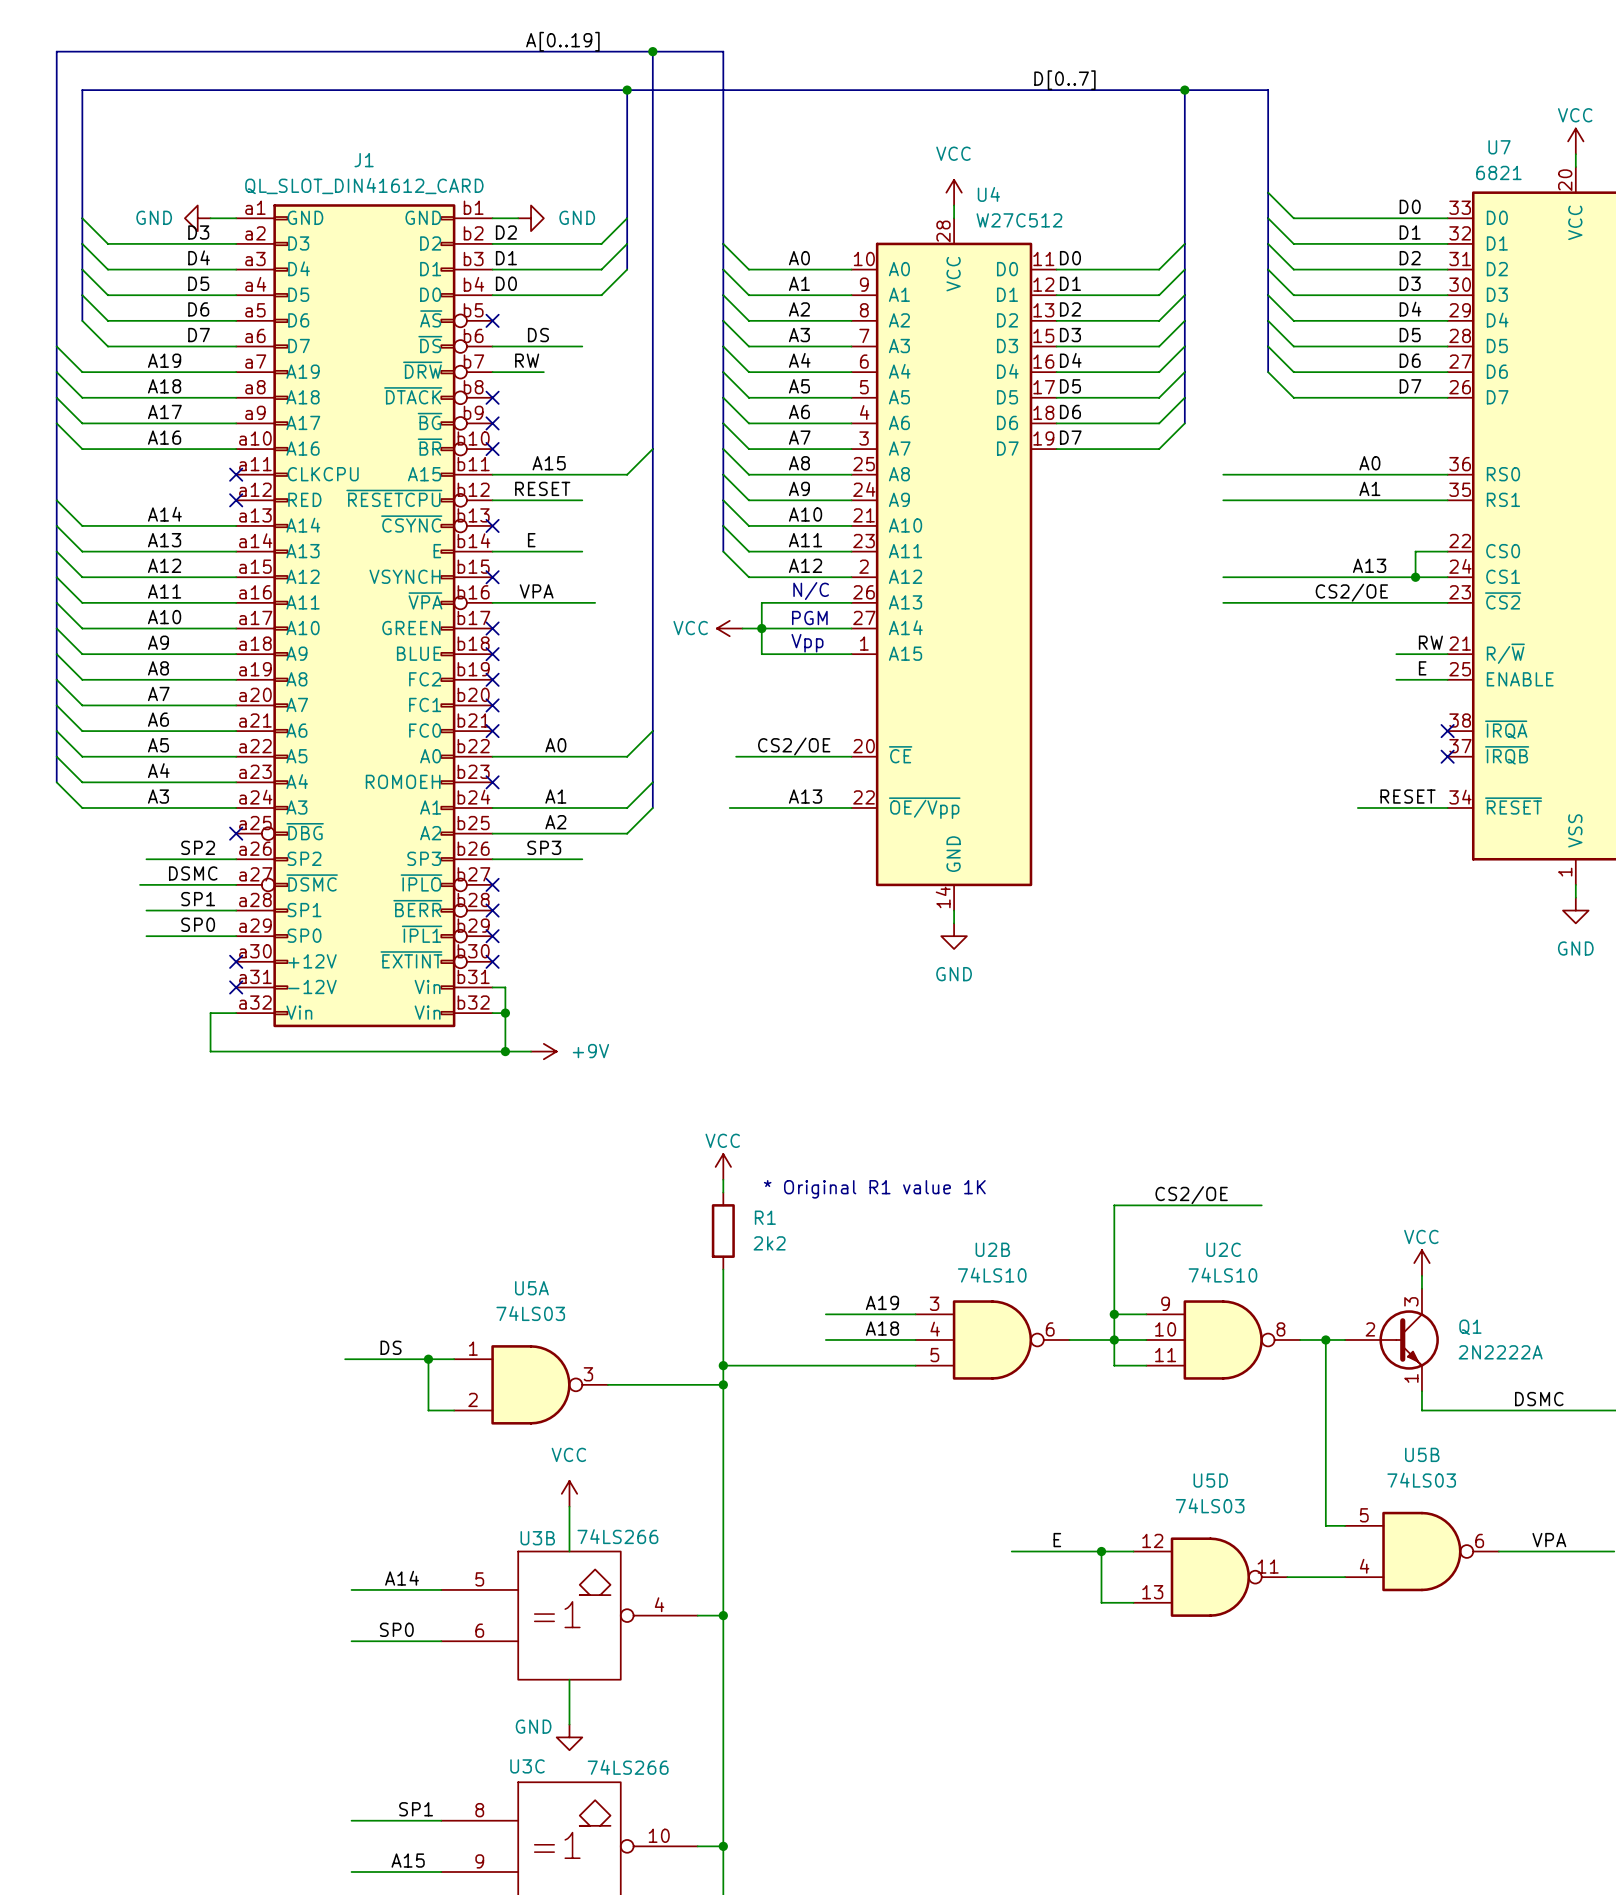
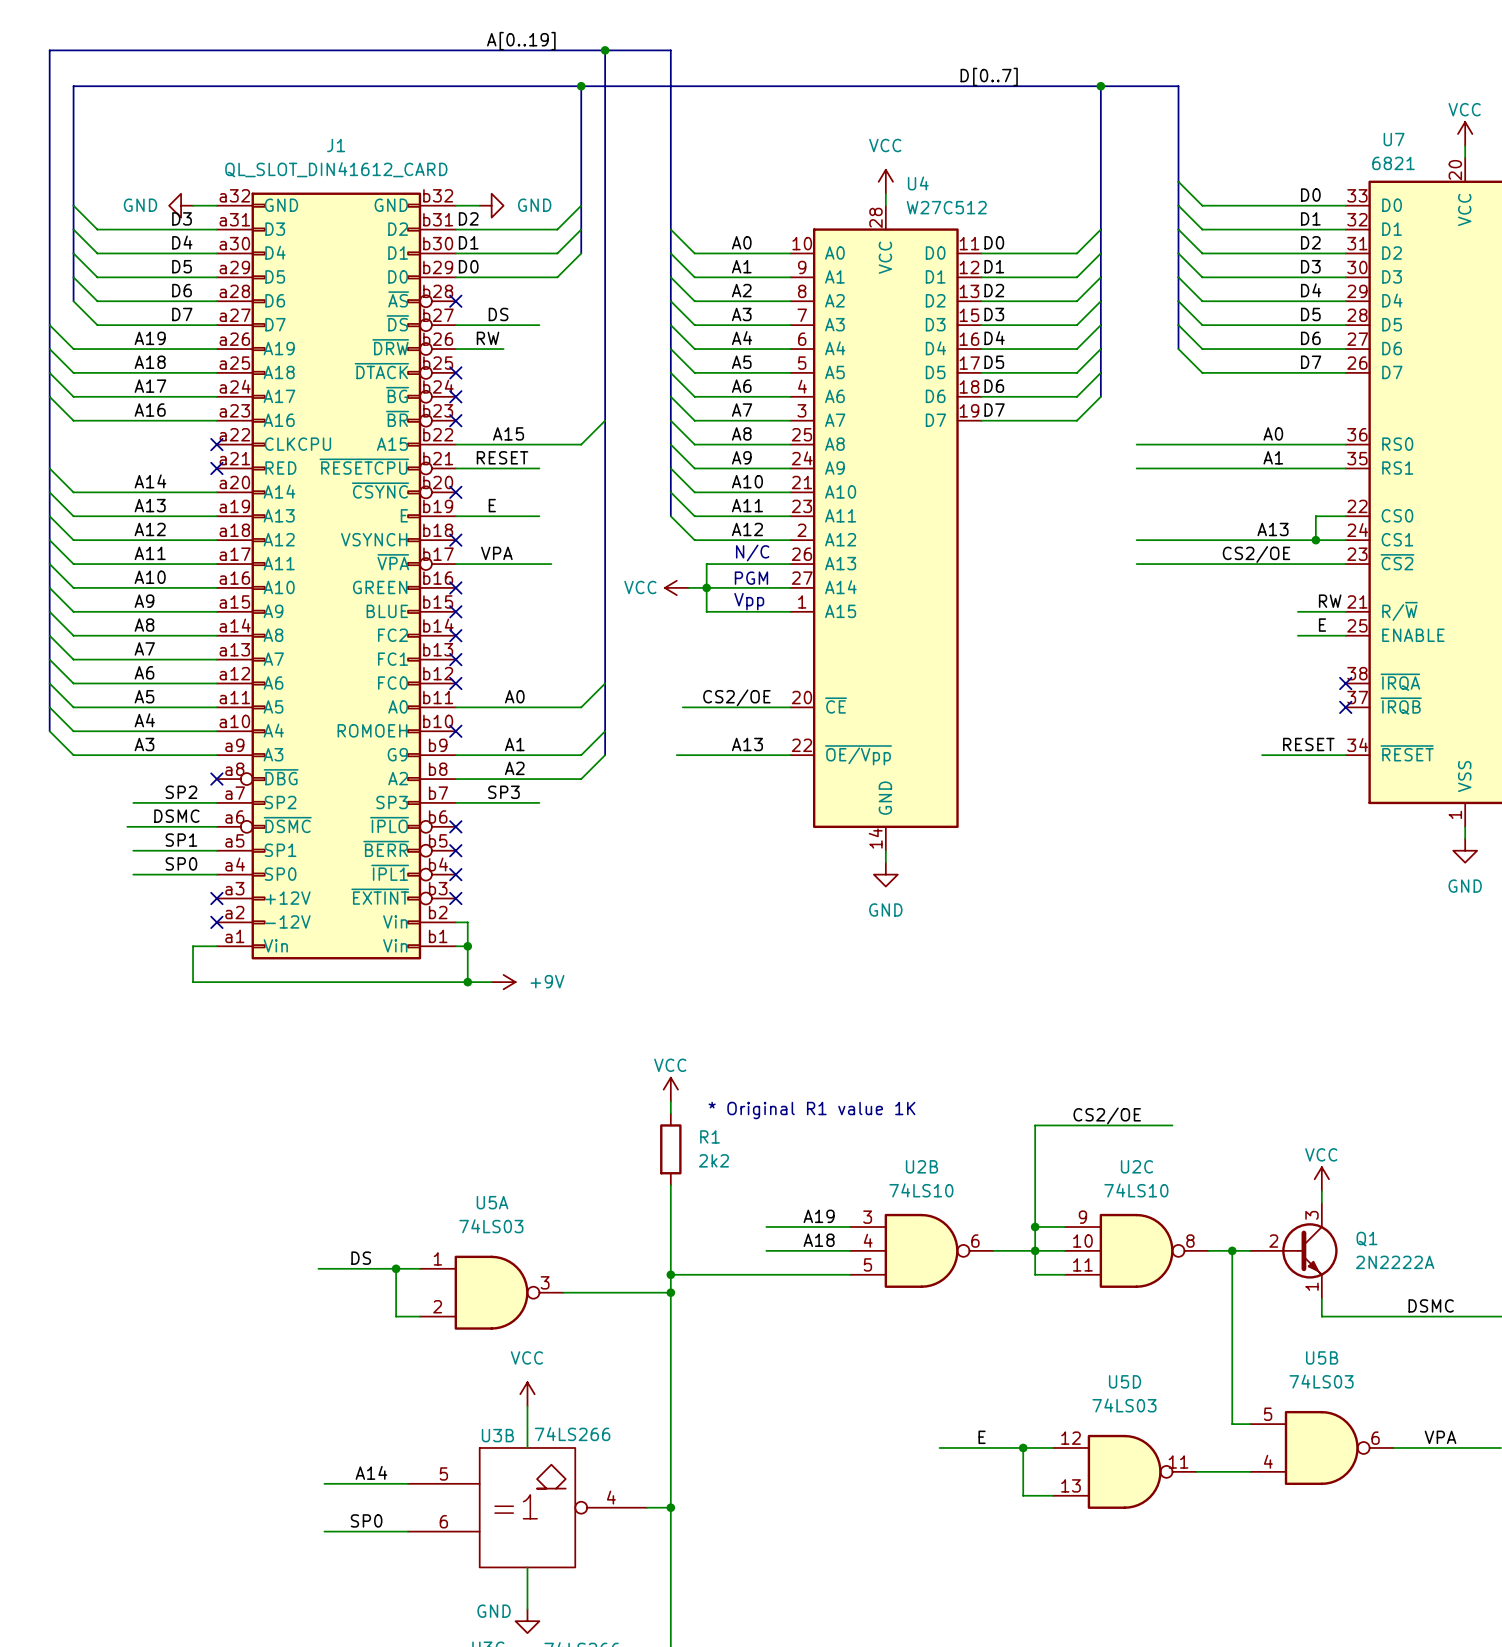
J1 symbol: [236, 204, 493, 1028] -> [216, 192, 456, 960]

